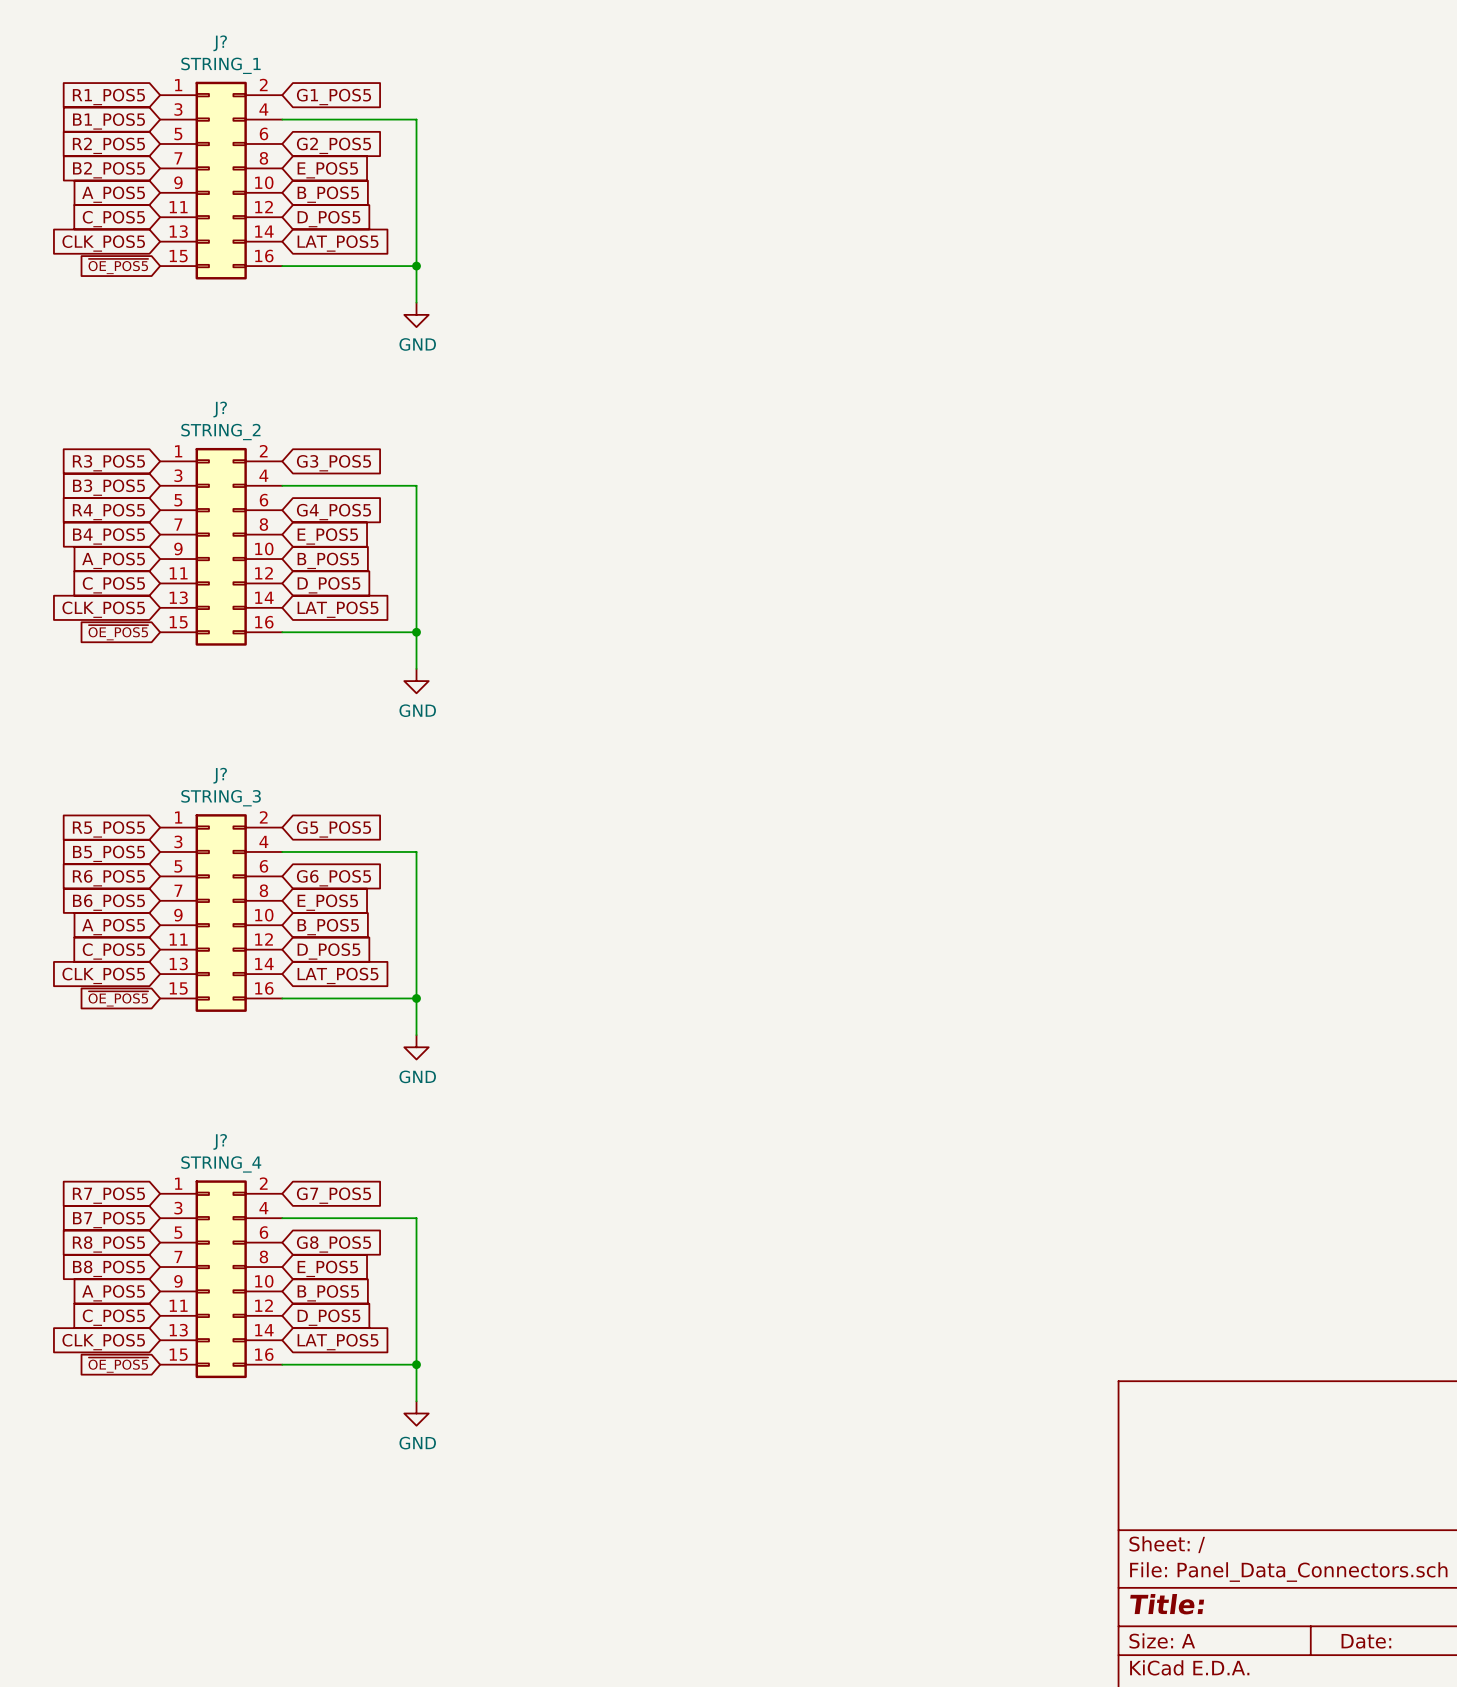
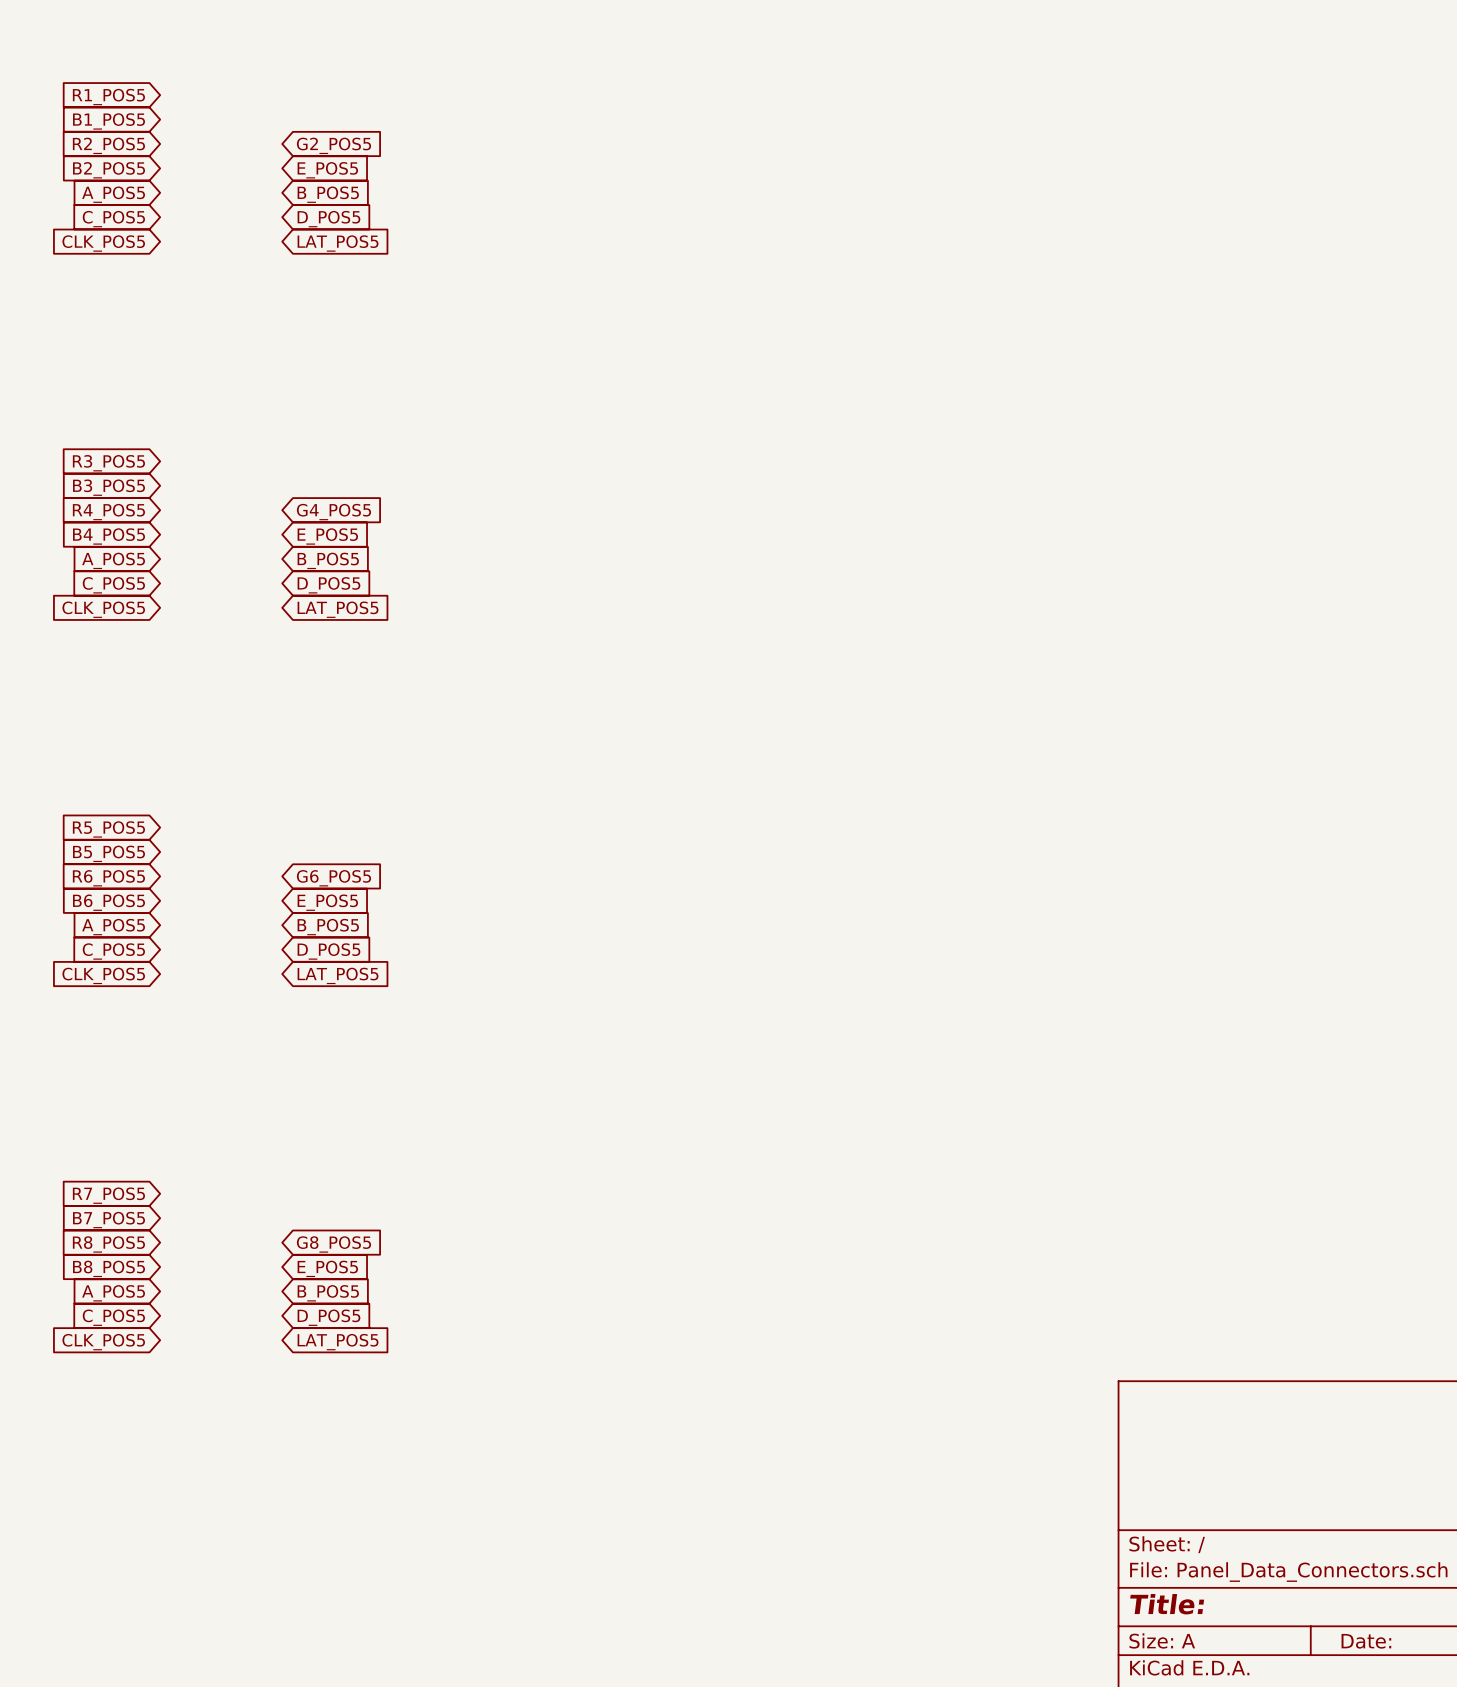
global label: G1_POS5 (333, 97) -> none
wire: (282, 119) (416, 119) (416, 302) -> none
J?: STRING_1 (221, 180) -> none
global label: ~{OE_POS5} (118, 266) -> none
wire: (282, 266) (416, 266) -> none
junction: (416, 266) -> none
power symbol: GND (416, 314) -> none
global label: G3_POS5 (333, 463) -> none
wire: (282, 485) (416, 485) (416, 668) -> none
J?: STRING_2 (221, 546) -> none
global label: ~{OE_POS5} (118, 632) -> none
wire: (282, 632) (416, 632) -> none
junction: (416, 632) -> none
power symbol: GND (416, 681) -> none
global label: G5_POS5 (333, 829) -> none
wire: (282, 851) (416, 851) (416, 1035) -> none
J?: STRING_3 (221, 913) -> none
global label: ~{OE_POS5} (118, 998) -> none
wire: (282, 998) (416, 998) -> none
junction: (416, 998) -> none
power symbol: GND (416, 1047) -> none
global label: G7_POS5 (333, 1195) -> none
wire: (282, 1218) (416, 1218) (416, 1401) -> none
J?: STRING_4 (221, 1279) -> none
wire: (282, 1364) (416, 1364) -> none
junction: (416, 1364) -> none
global label: ~{OE_POS5} (118, 1365) -> none
power symbol: GND (416, 1413) -> none

